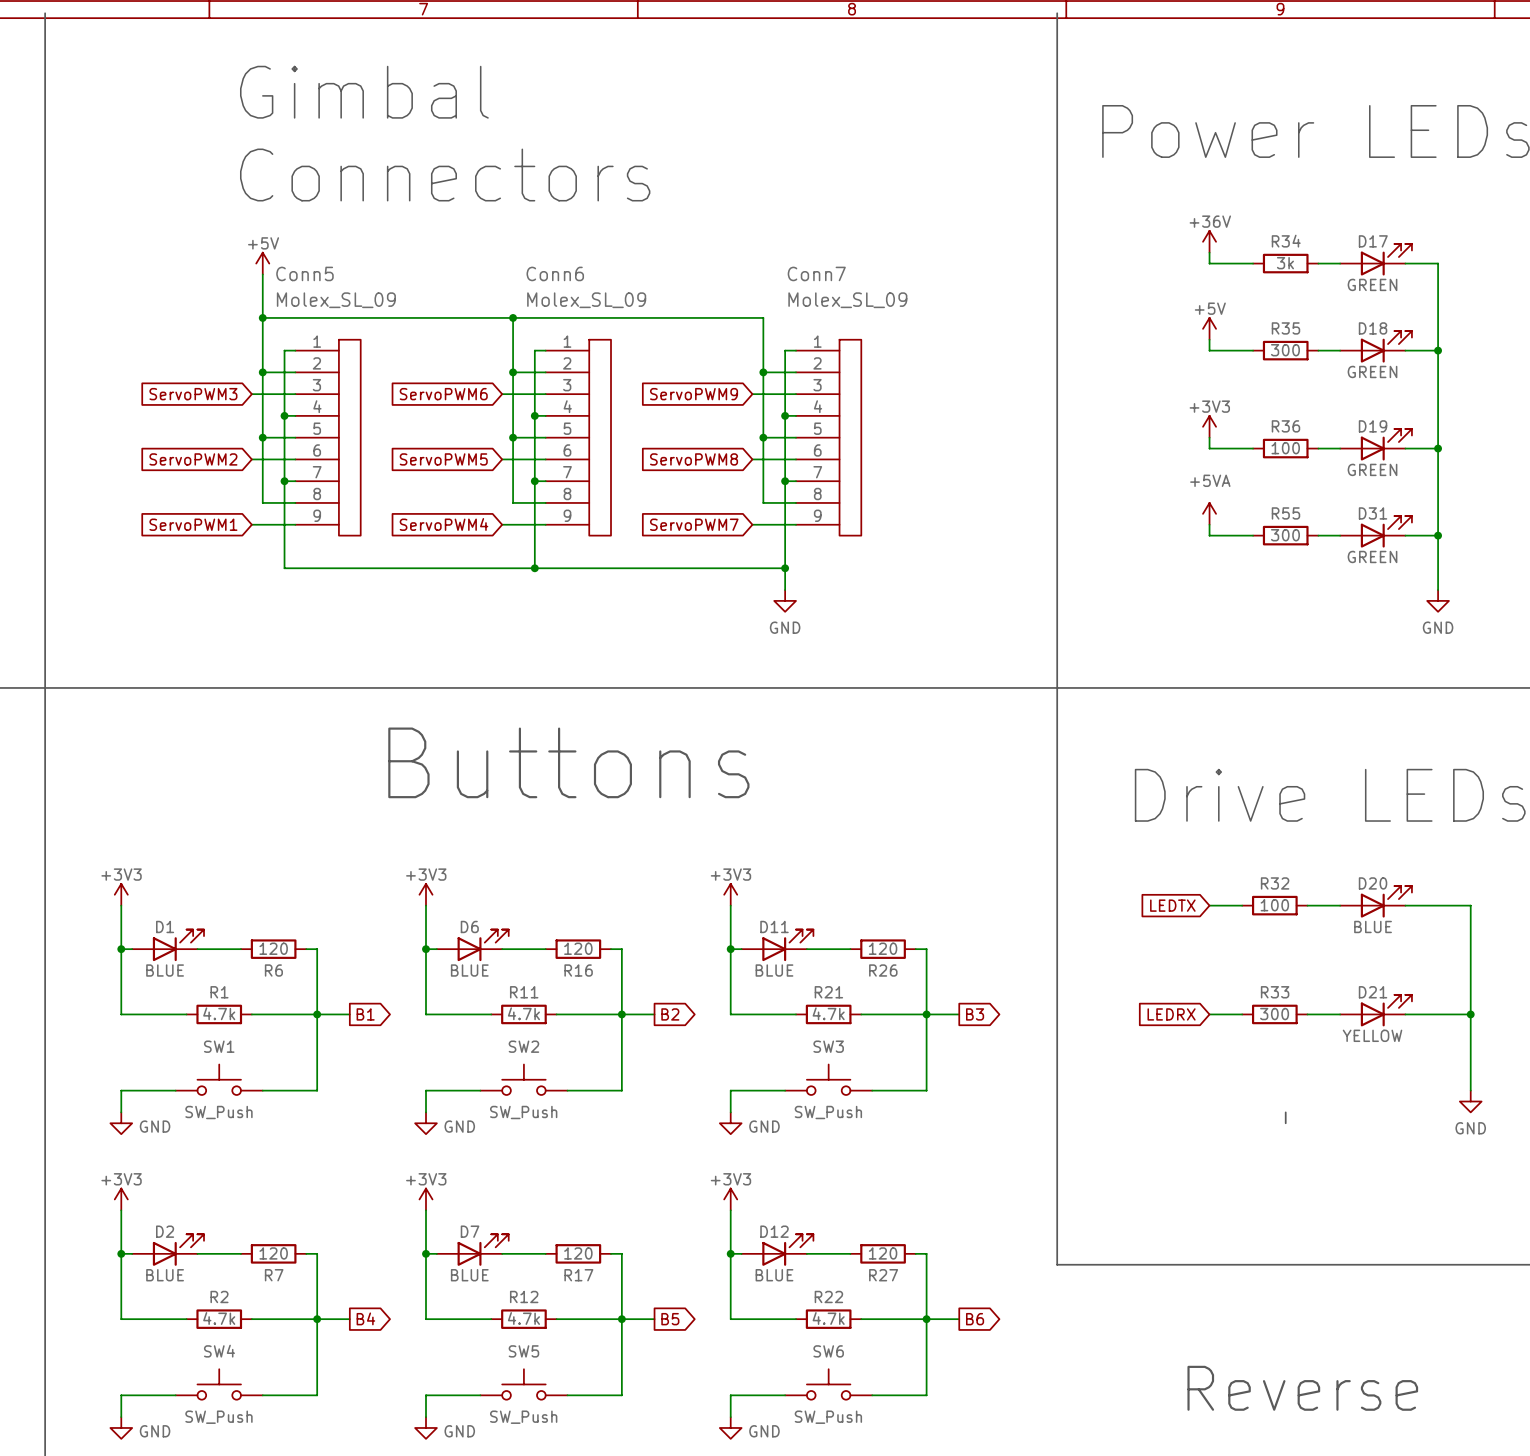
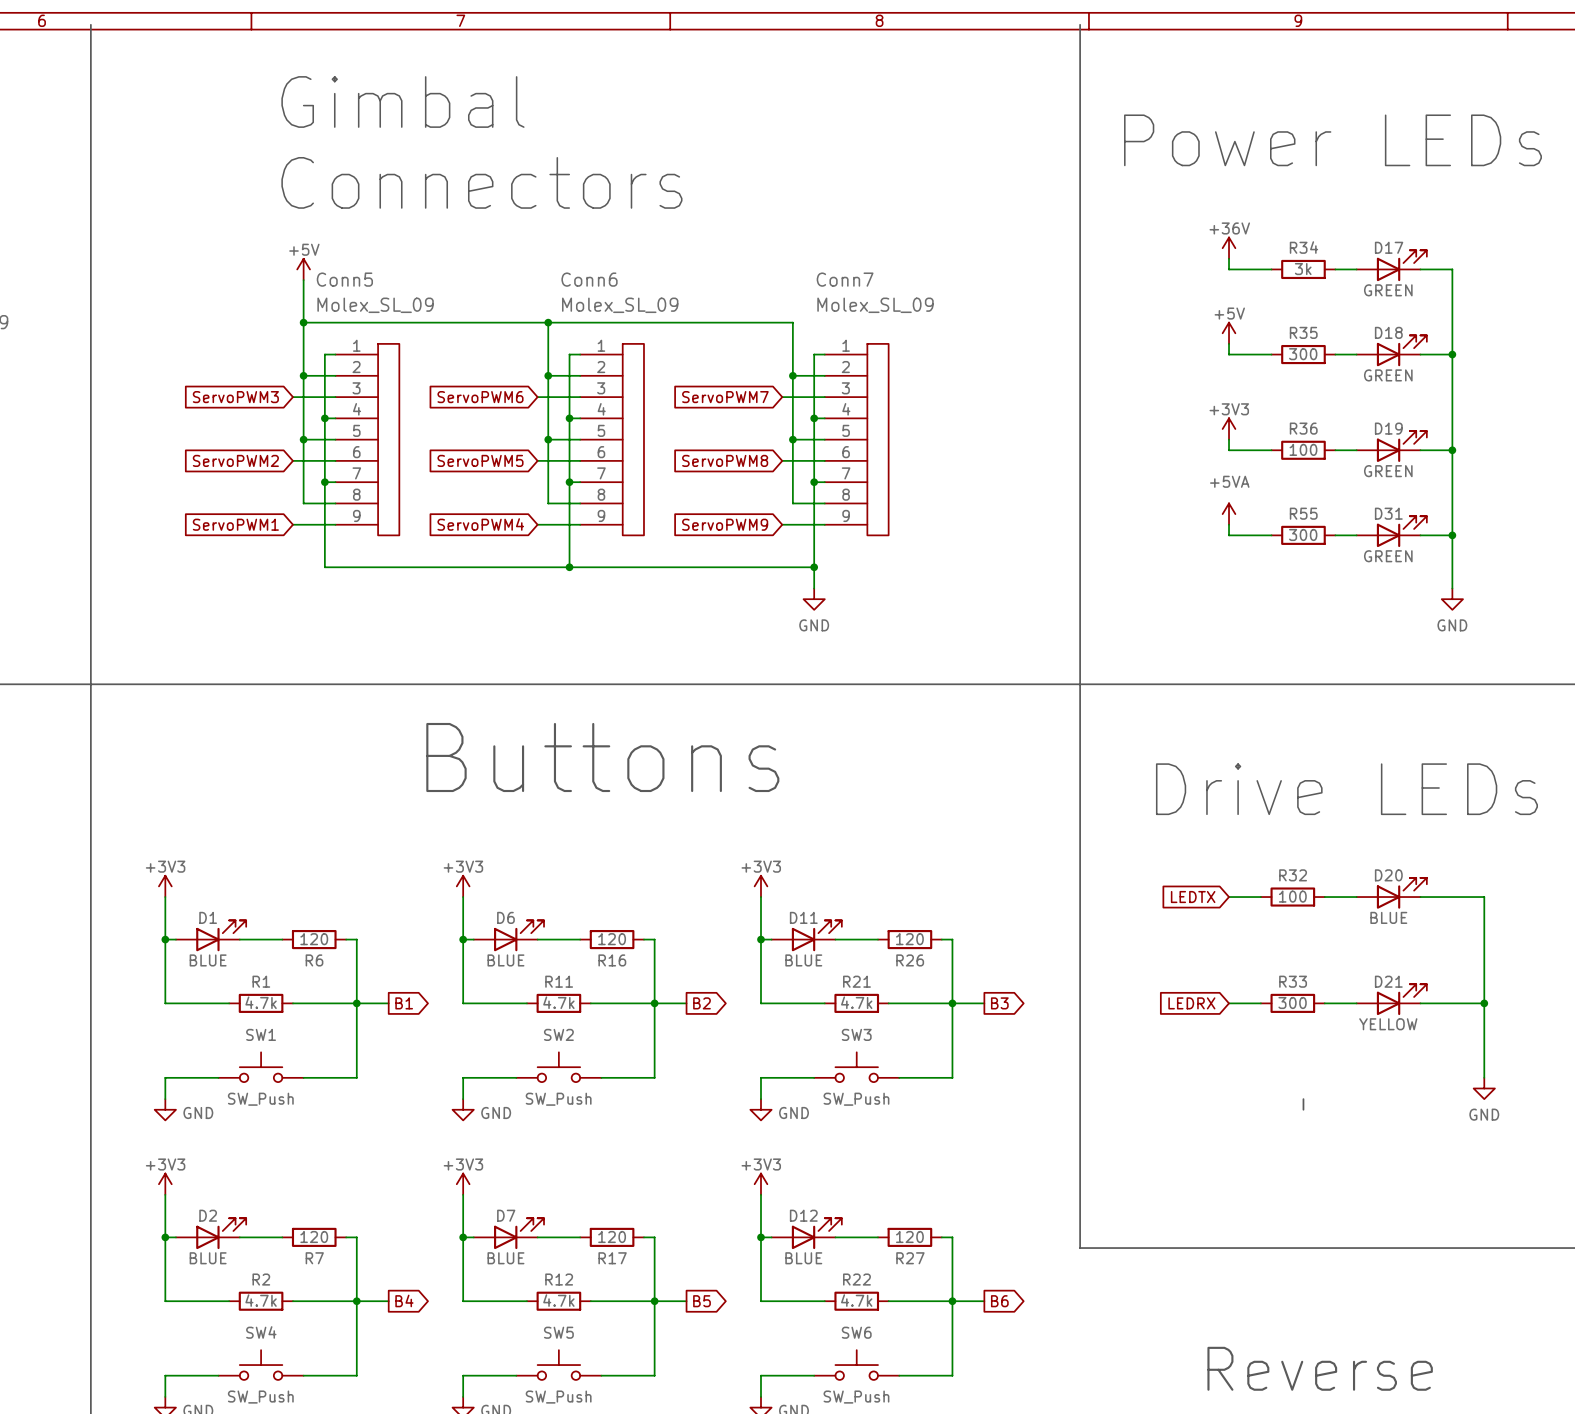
global label: ServoPWM9 (694, 394) -> ServoPWM7 (725, 397)
global label: ServoPWM7 (694, 524) -> ServoPWM9 (725, 524)

